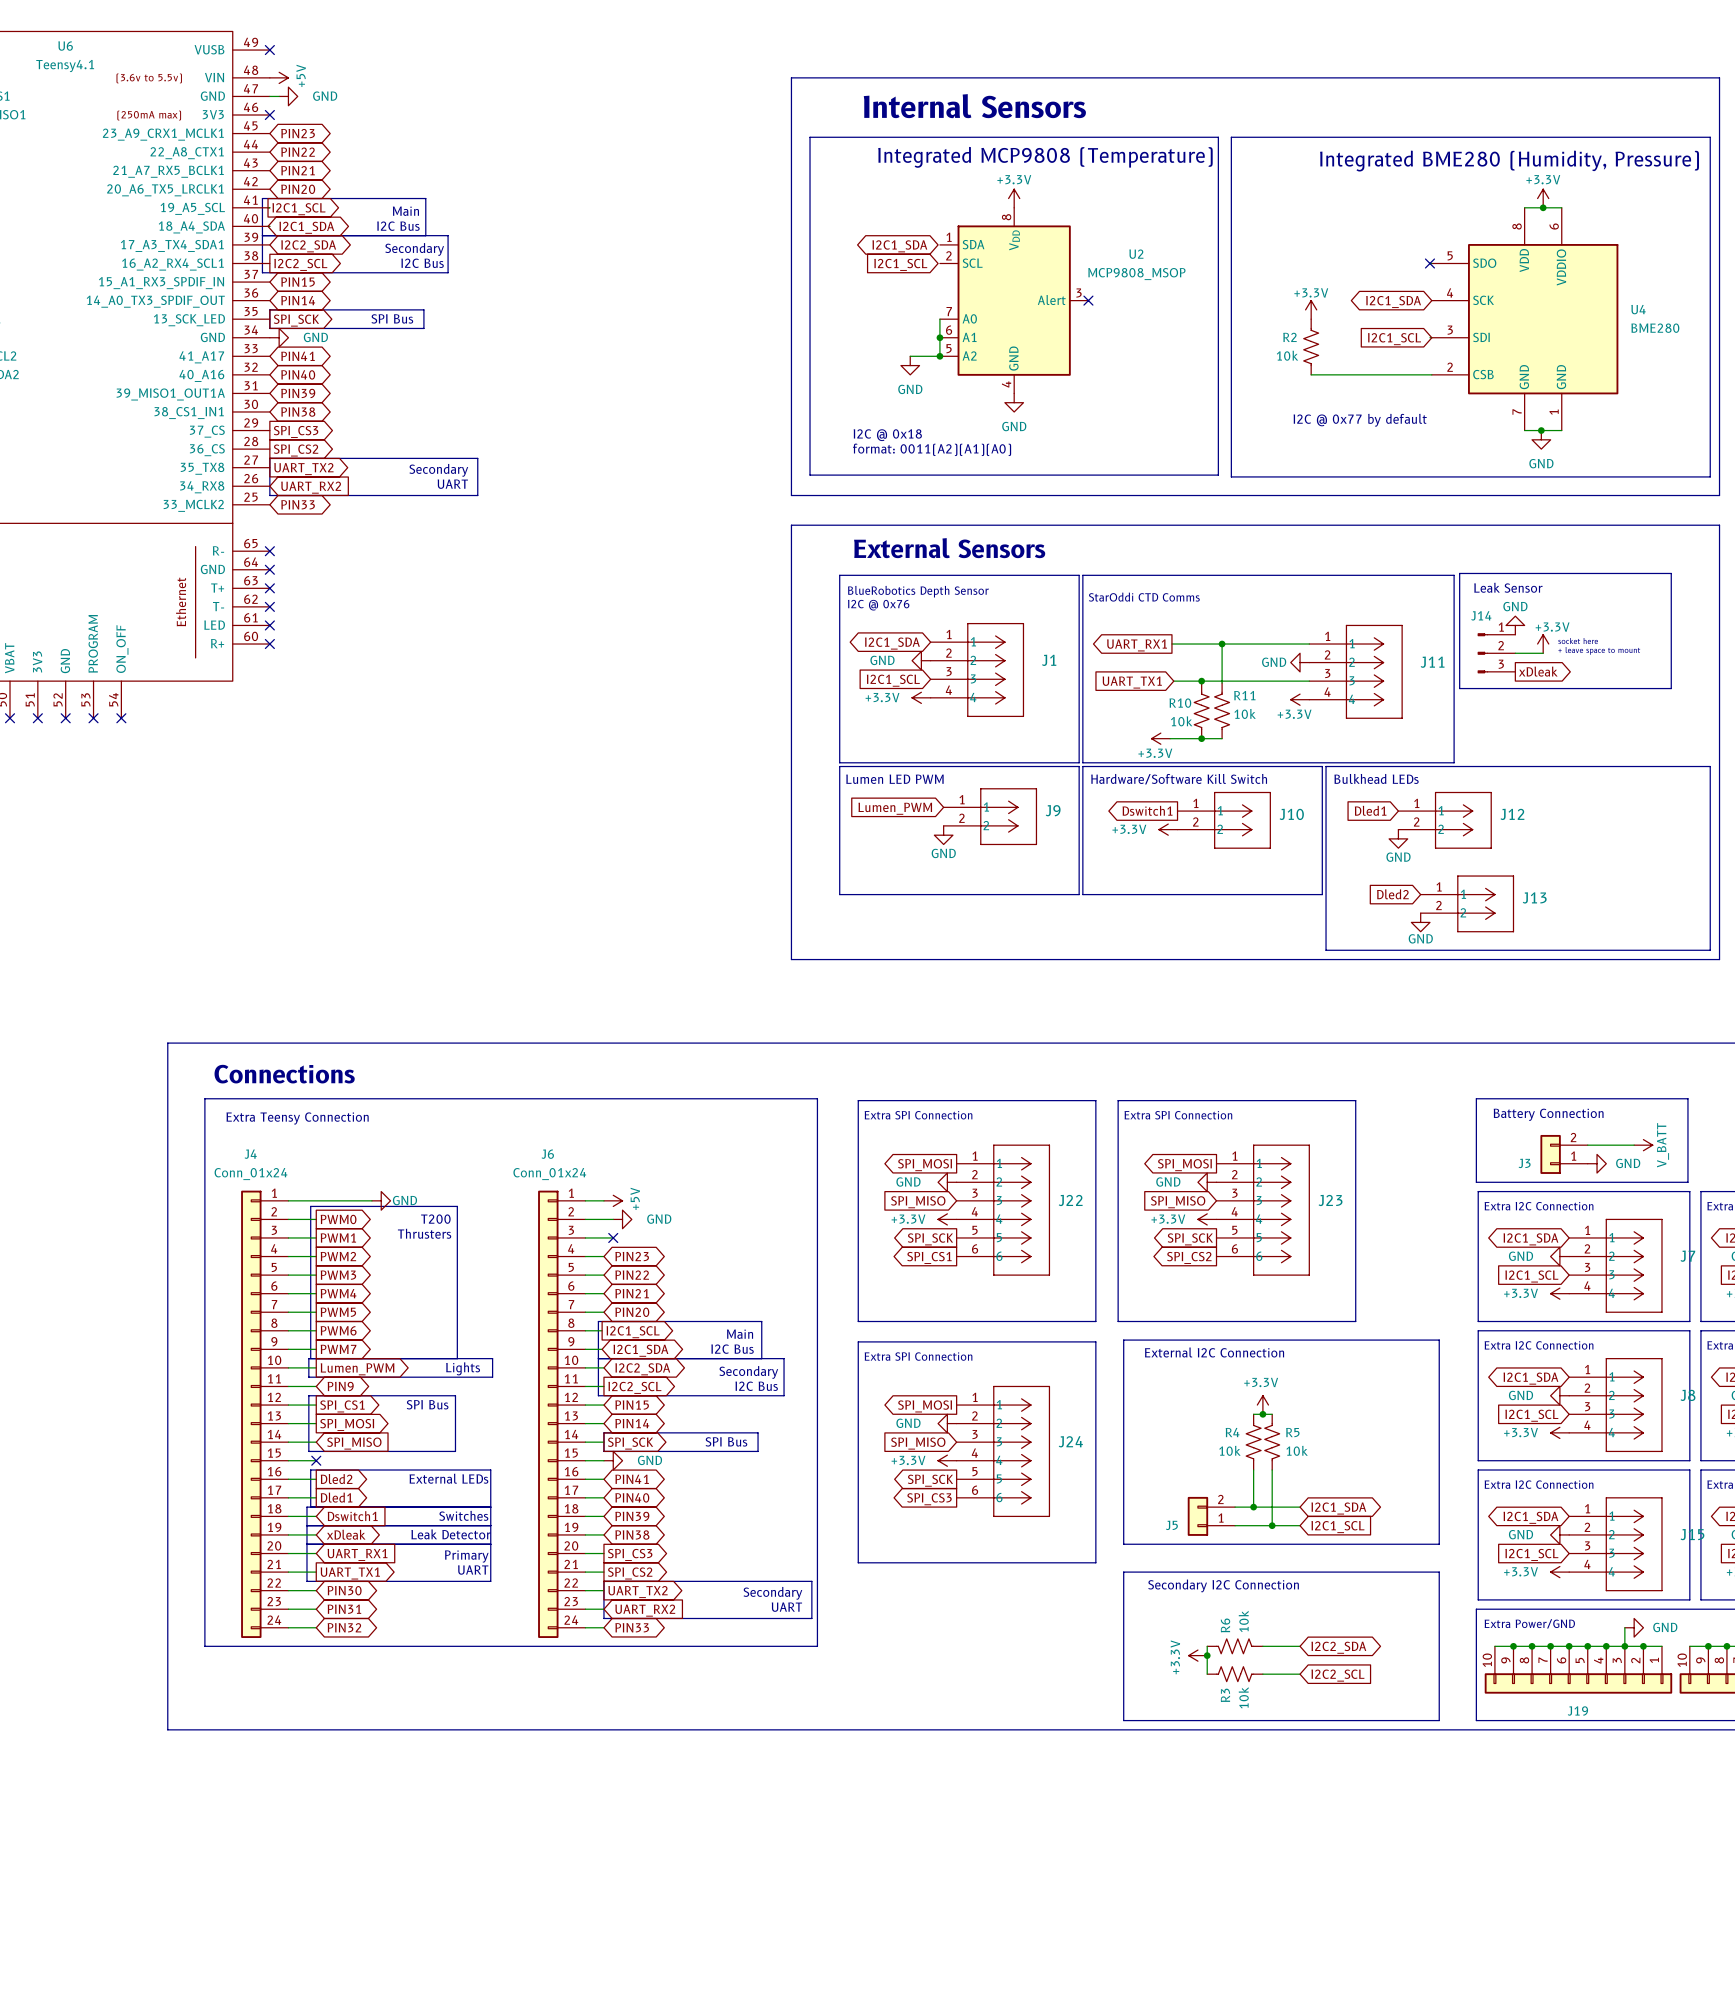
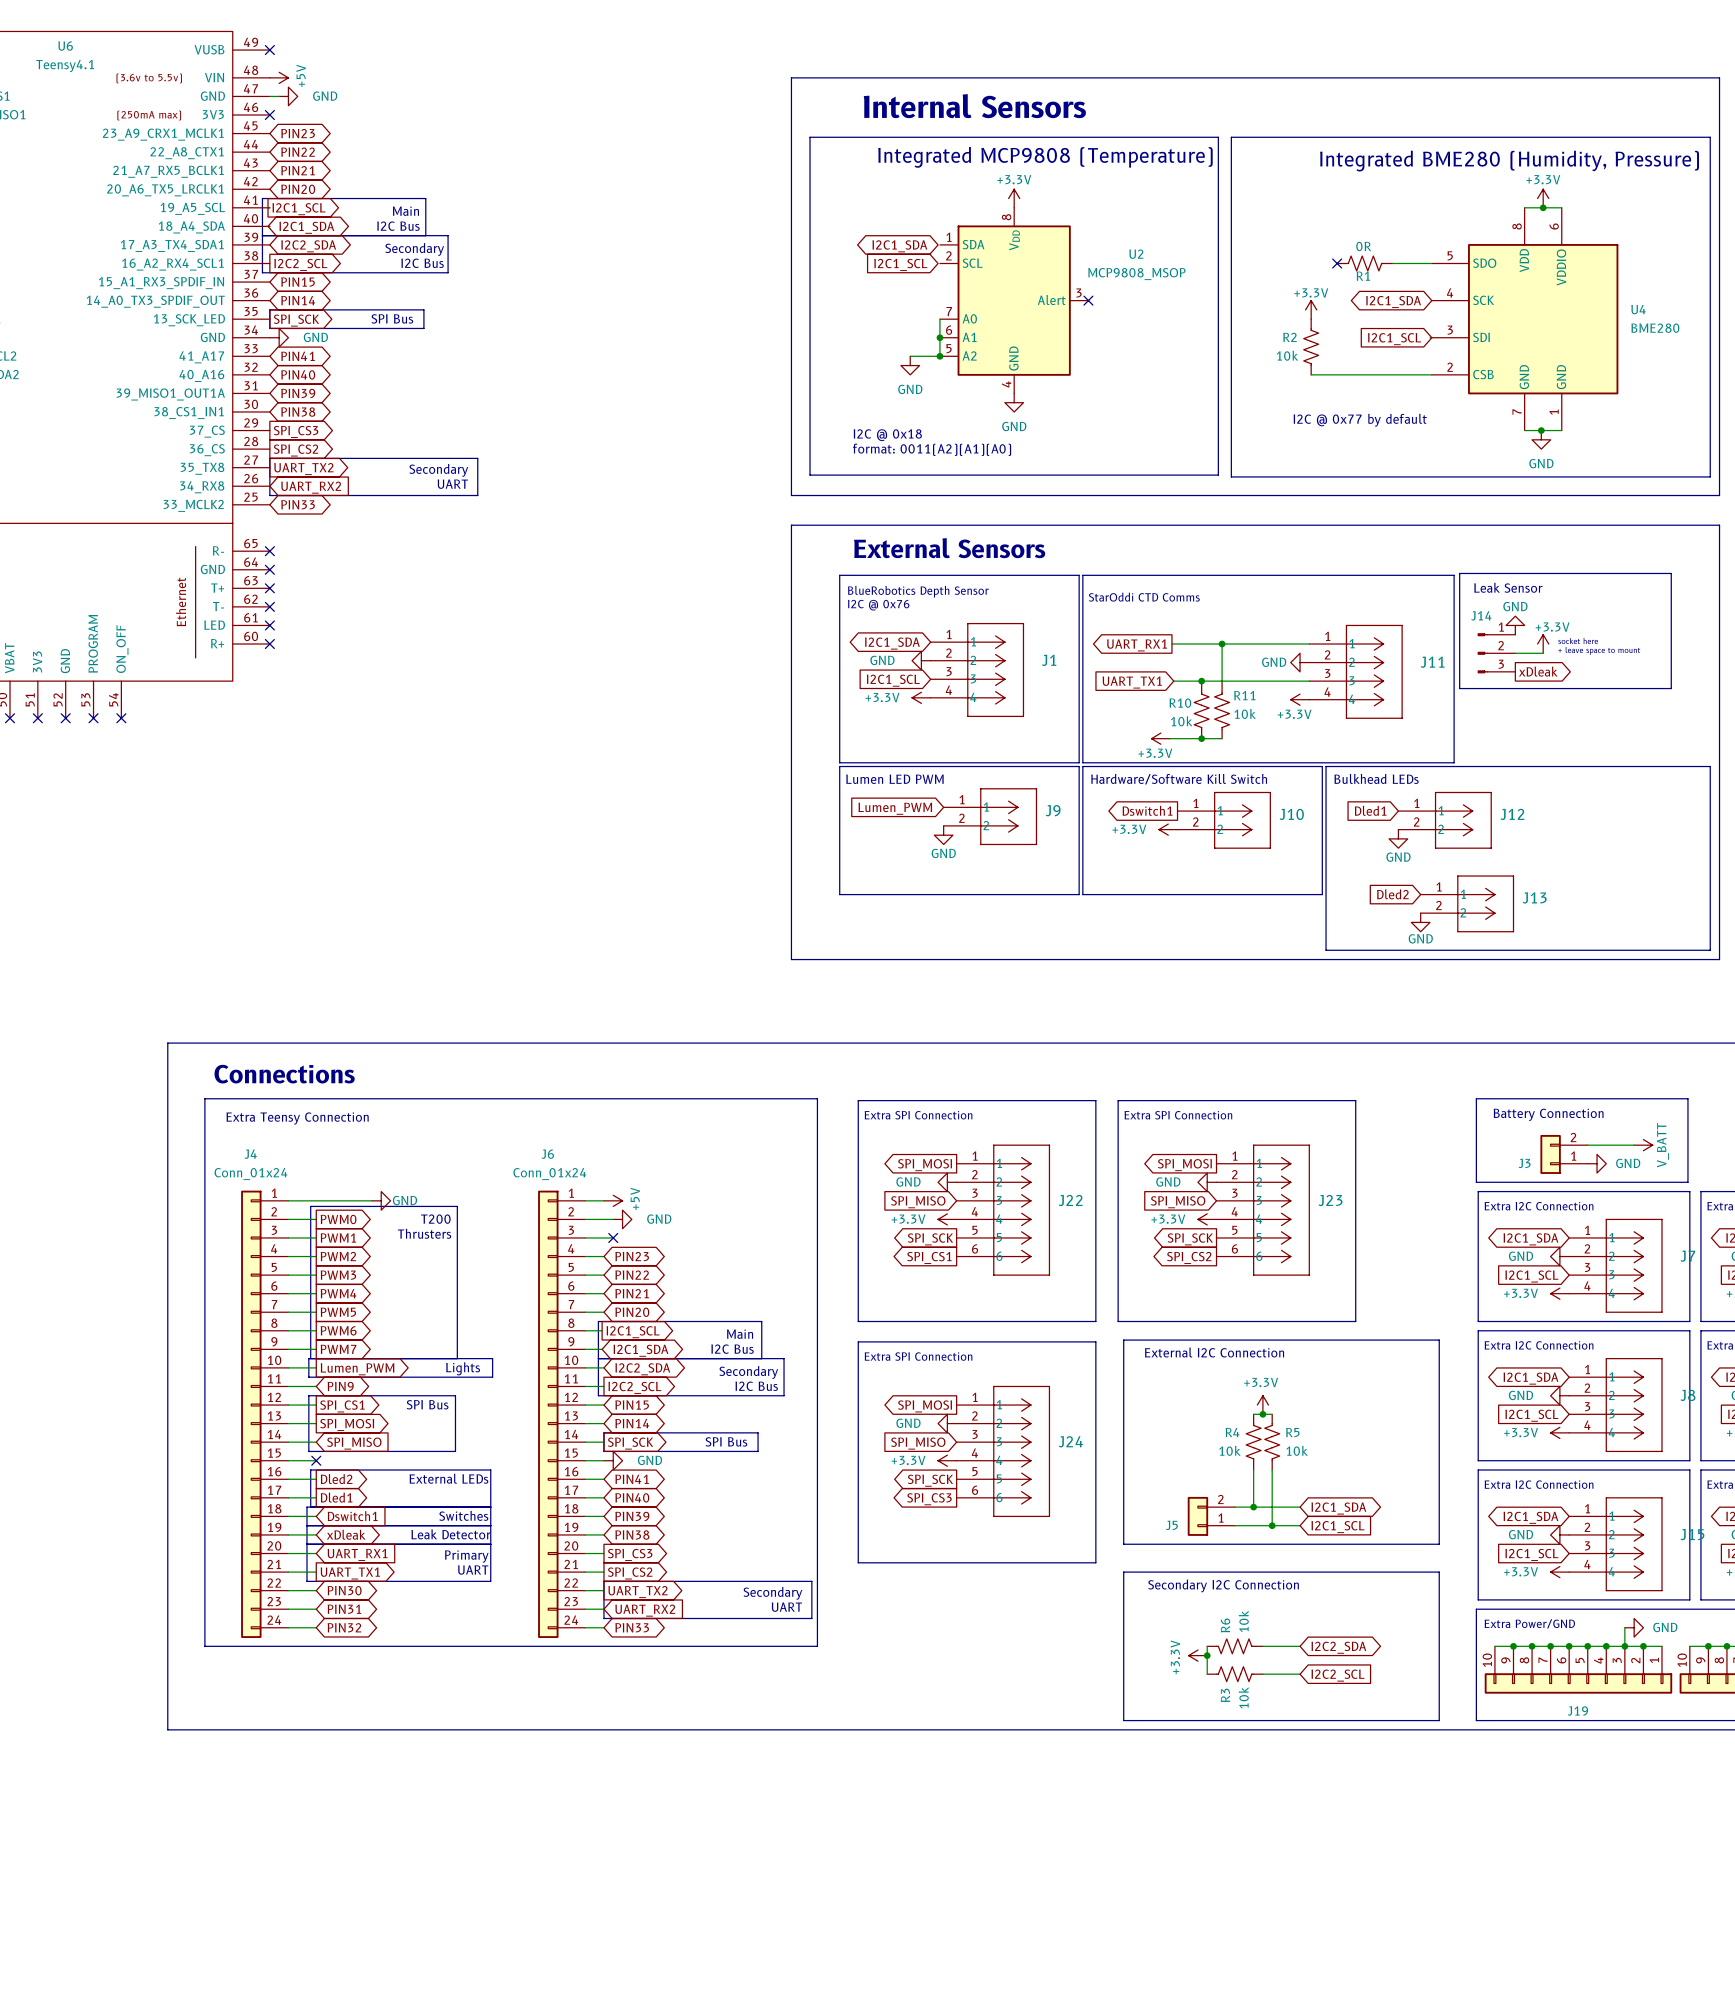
no-connect mark: none -> (1337, 263)
R1: none -> 0R (1365, 263)
wire: none -> (1392, 263) (1429, 263)
no-connect mark: (1429, 263) -> none

